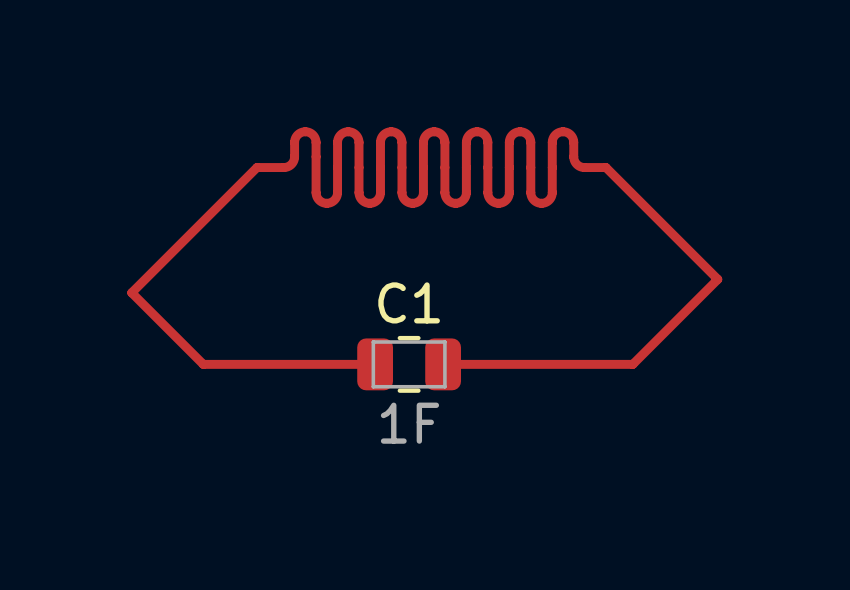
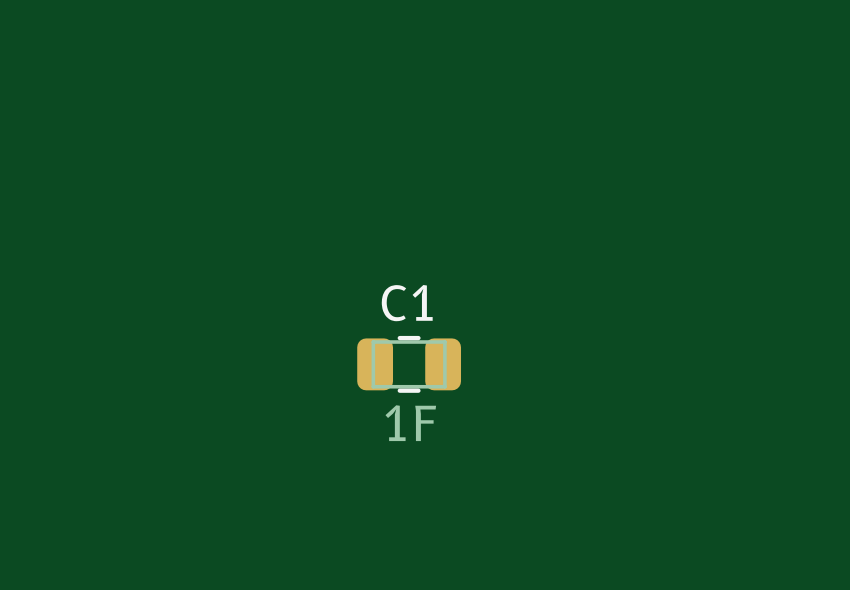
track: (375, 364) (203, 364) (131, 292) (257, 167) (285, 167) (291, 164) (294, 158) (295, 138) (298, 133) (305, 131) (311, 133) (315, 141) (316, 195) (320, 201) (326, 203) (333, 201) (337, 195) (337, 141) (340, 134) (345, 132) (352, 132) (358, 138) (359, 193) (363, 201) (369, 203) (376, 201) (380, 195) (380, 141) (387, 132) (395, 132) (401, 138) (402, 193) (406, 201) (412, 203) (419, 201) (423, 195) (423, 141) (430, 132) (438, 132) (444, 138) (444, 193) (449, 201) (455, 203) (462, 201) (466, 195) (466, 141) (471, 133) (479, 132) (487, 138) (487, 193) (491, 200) (498, 203) (505, 201) (509, 193) (510, 138) (518, 131) (527, 134) (530, 142) (531, 195) (535, 201) (541, 203) (548, 201) (552, 193) (553, 138) (558, 132) (567, 132) (573, 139) (573, 158) (576, 164) (583, 167) (605, 167) (717, 279) (632, 364) (443, 364) -> none

